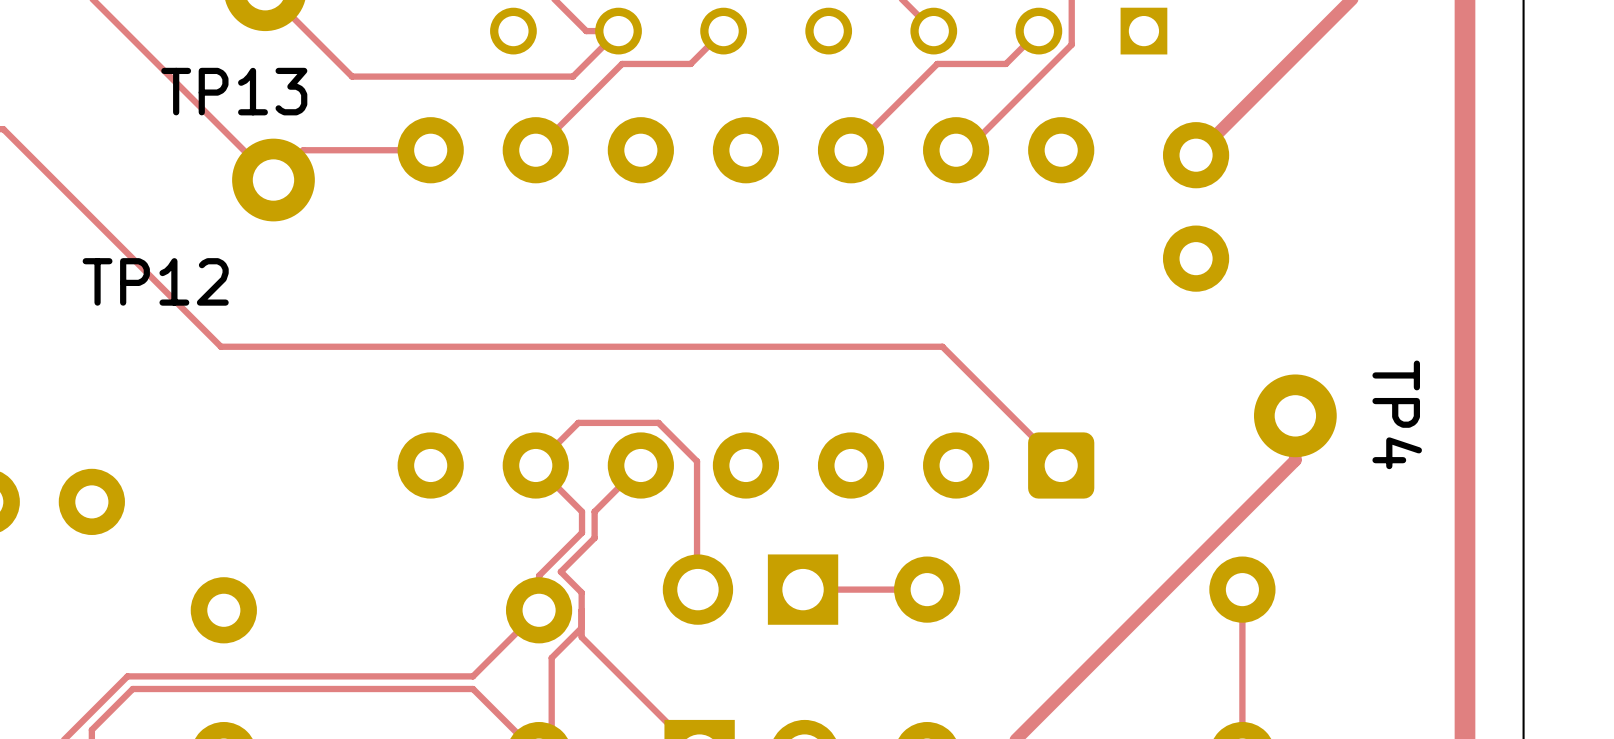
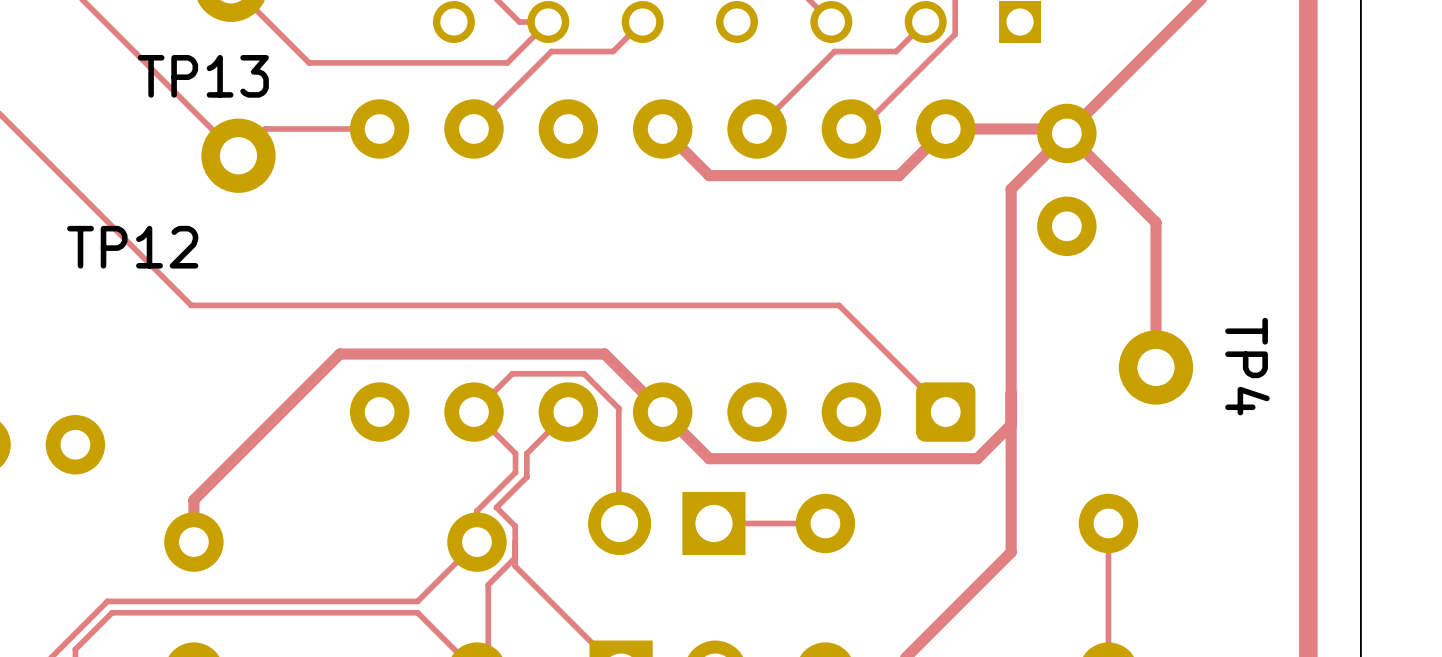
top track: none -> (1062, 128) (945, 128) (899, 175) (709, 175) (662, 128)
top track: (1295, 415) (1295, 460) (1134, 621) -> (1156, 367) (1156, 222) (1066, 133) (1011, 189) (1011, 552)
top track: none -> (1011, 424) (977, 458) (709, 458) (604, 354) (339, 354) (193, 500) (193, 542)

